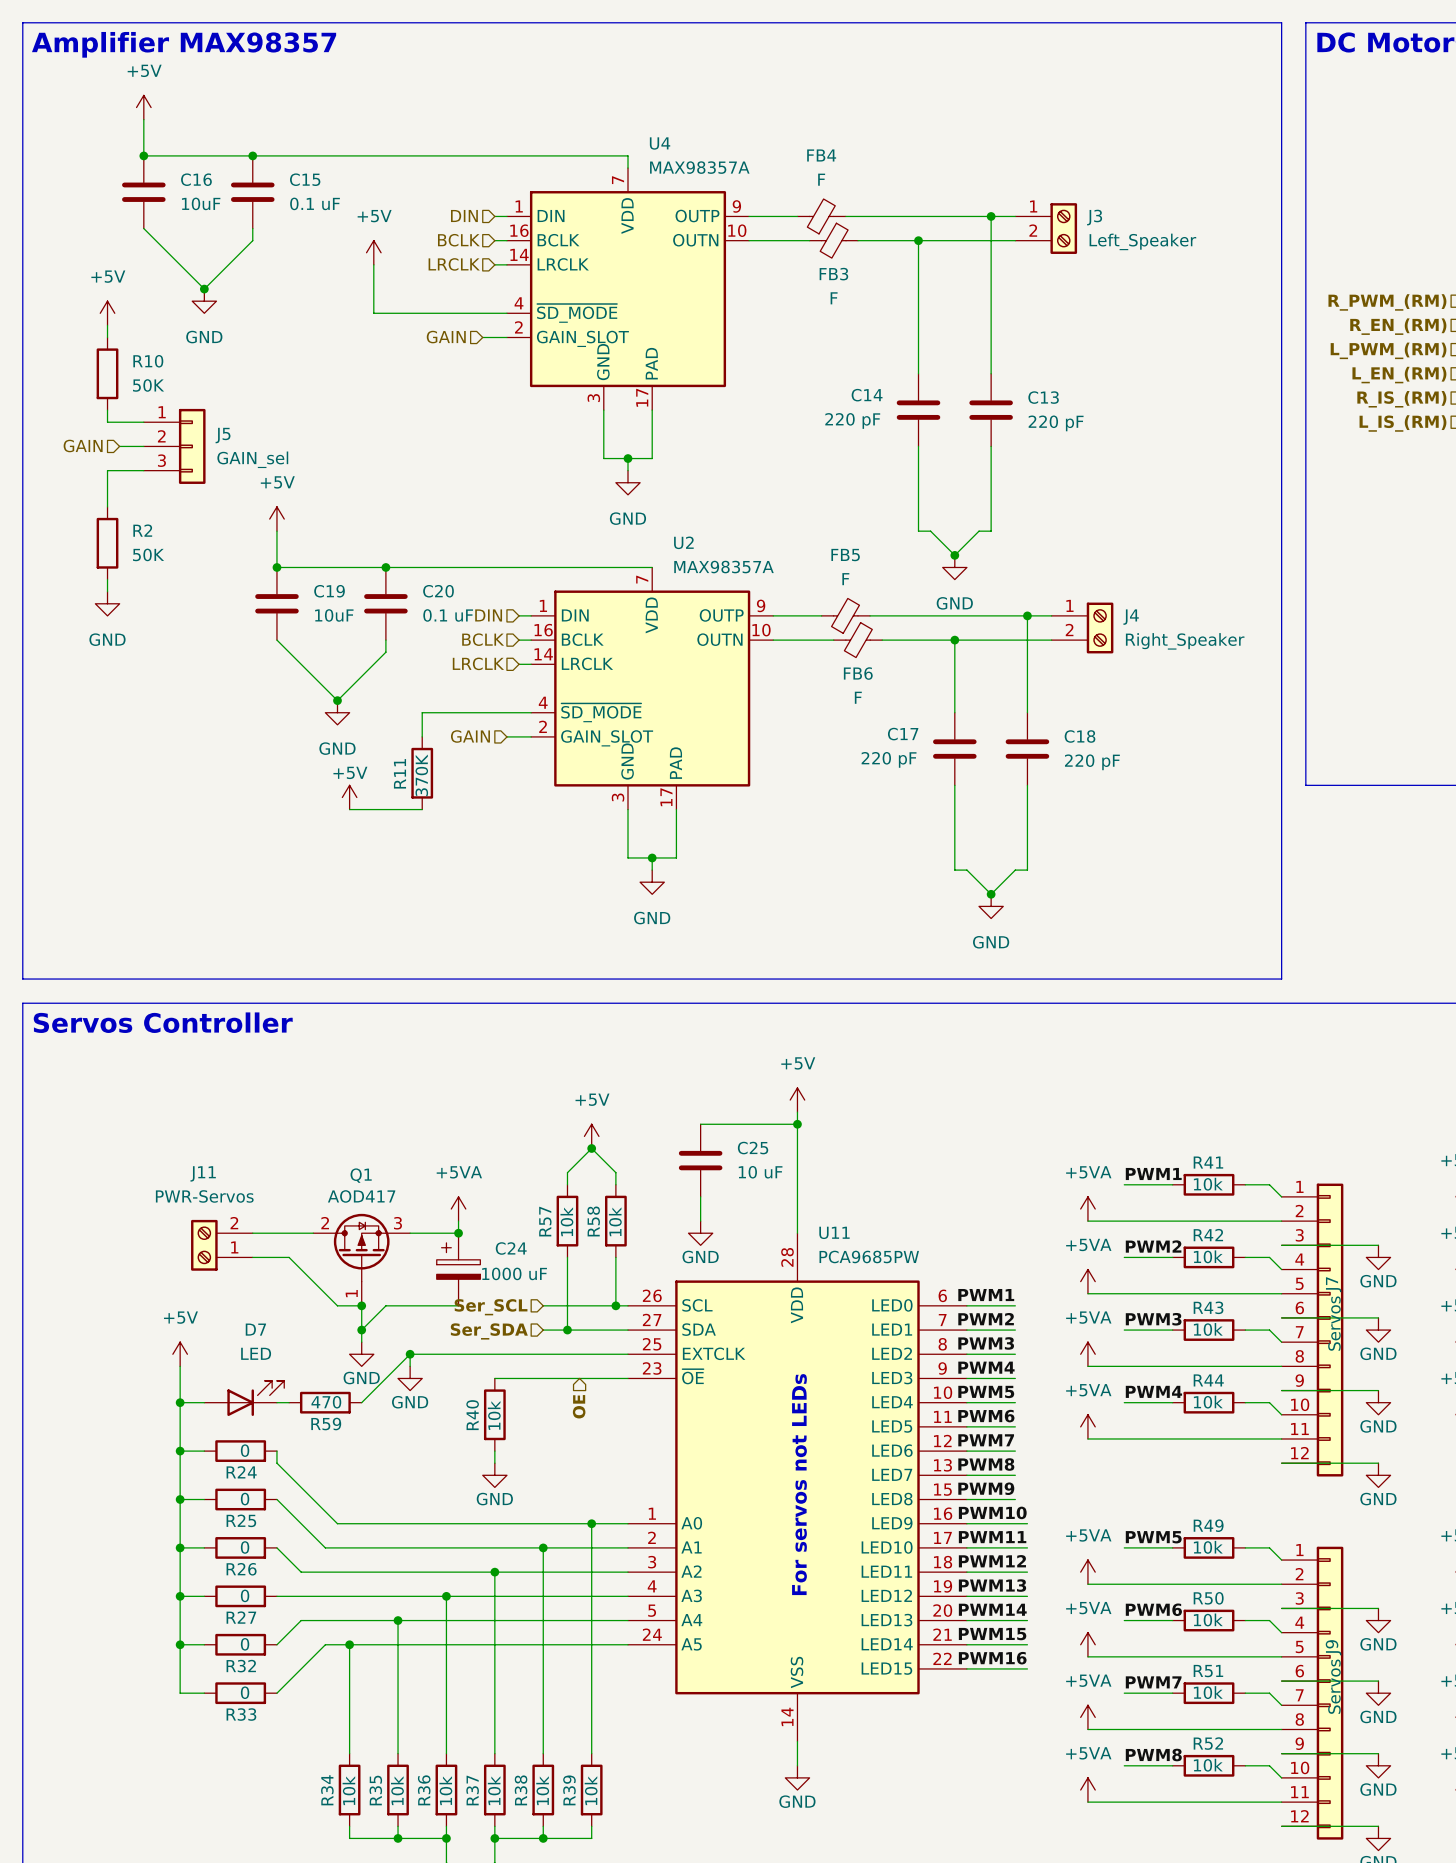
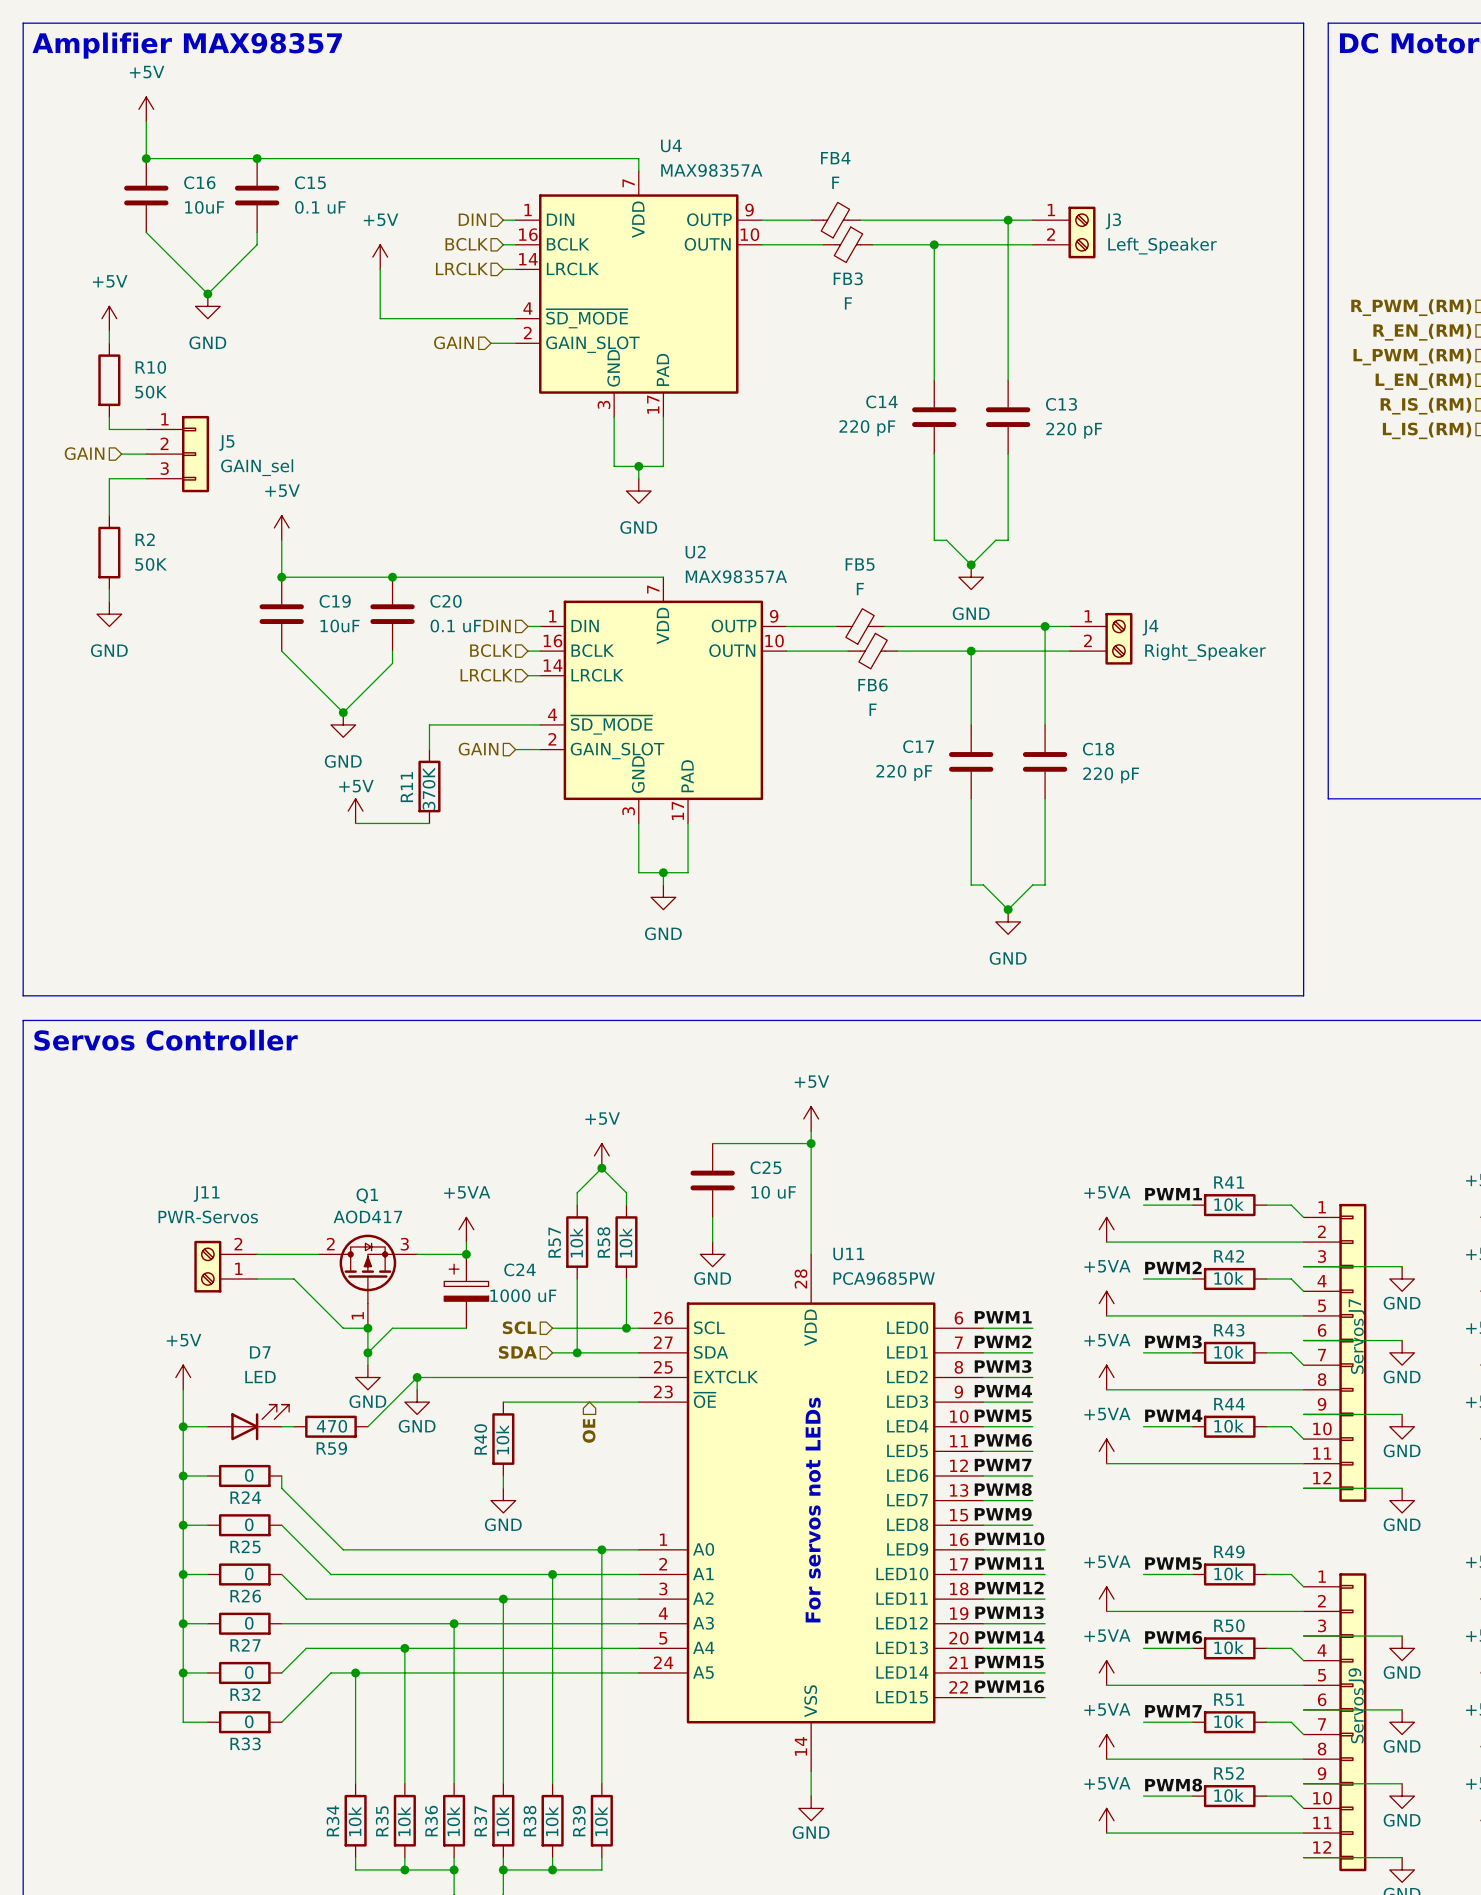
hierarchical label: Ser_SCL (491, 1307) -> SCL (519, 1327)
hierarchical label: Ser_SDA (489, 1331) -> SDA (517, 1352)

